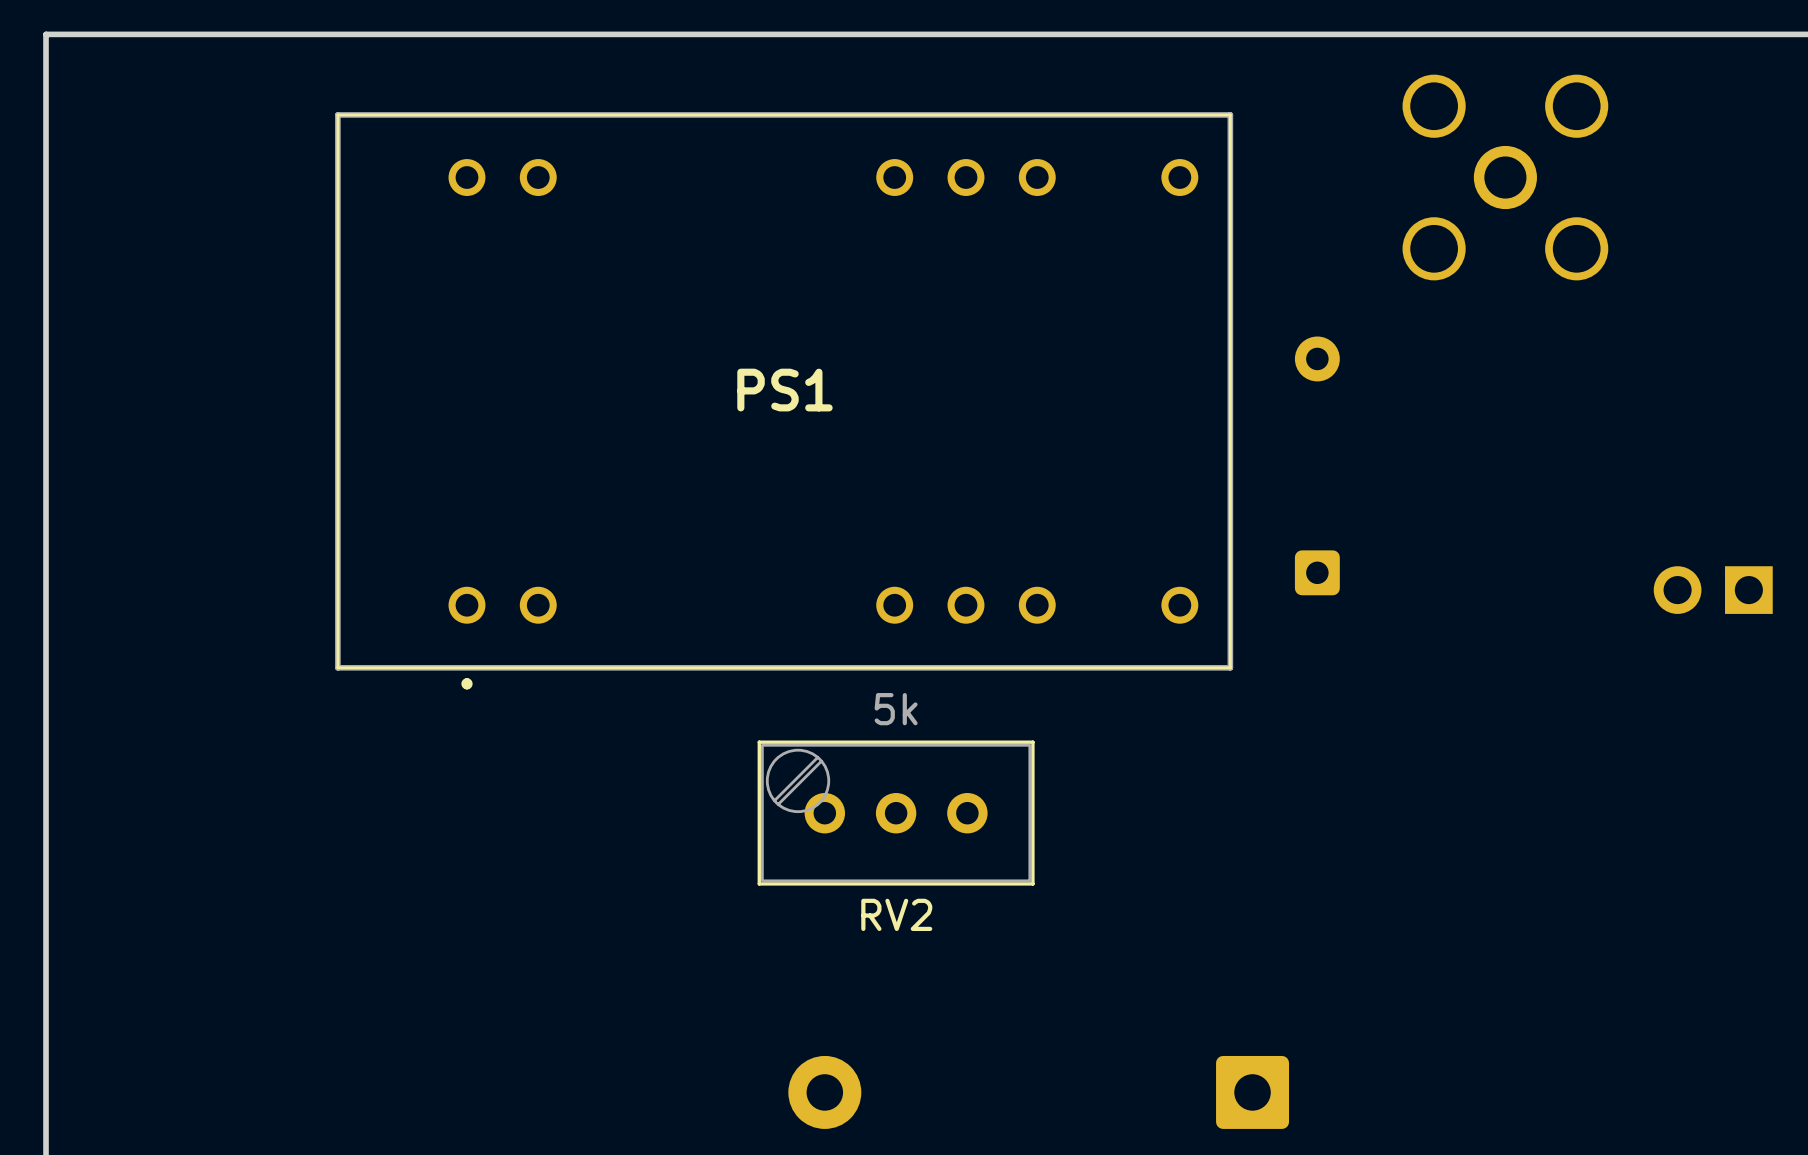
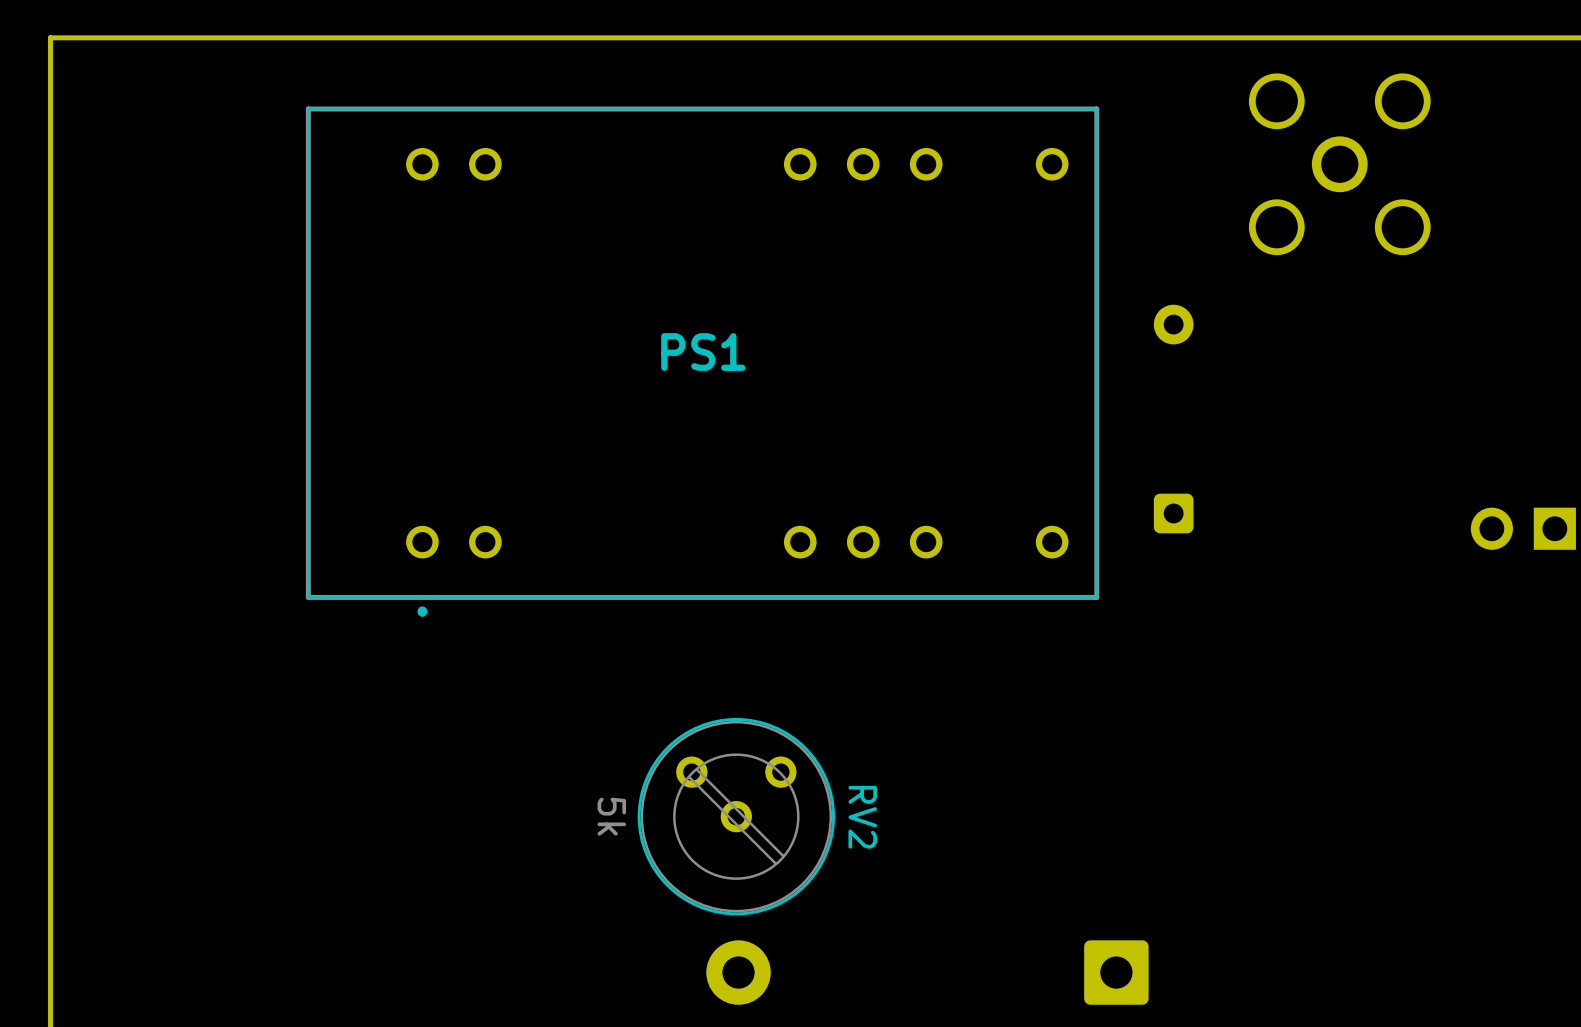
RV2 value position: 5k (896, 709) -> 5k (611, 816)
RV2 footprint: [757, 740, 1035, 886] -> [637, 717, 836, 916]
RV2 name position: RV2 (896, 914) -> RV2 (862, 817)

